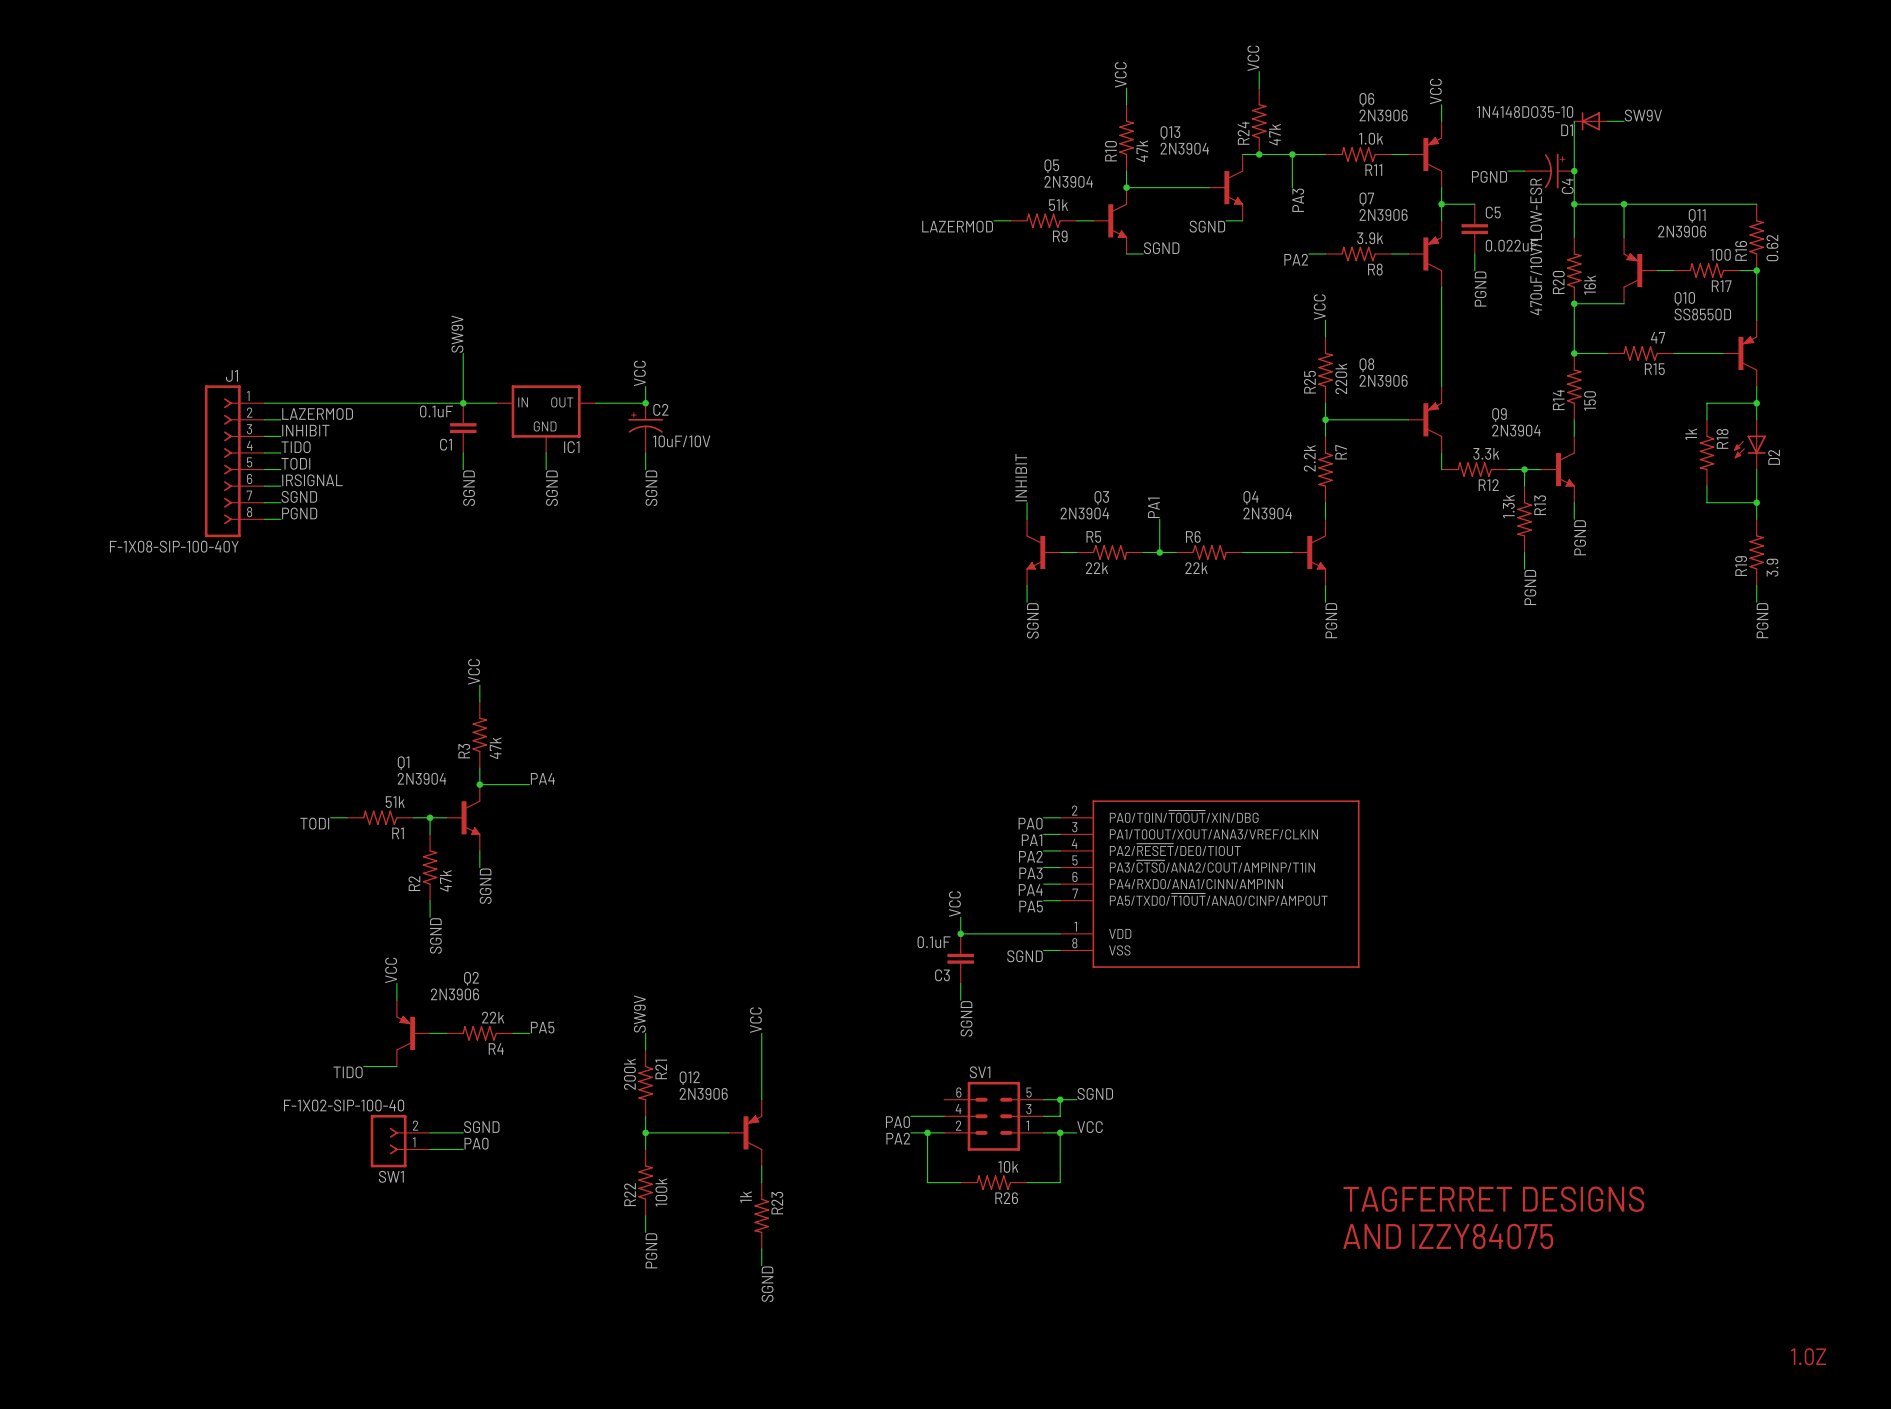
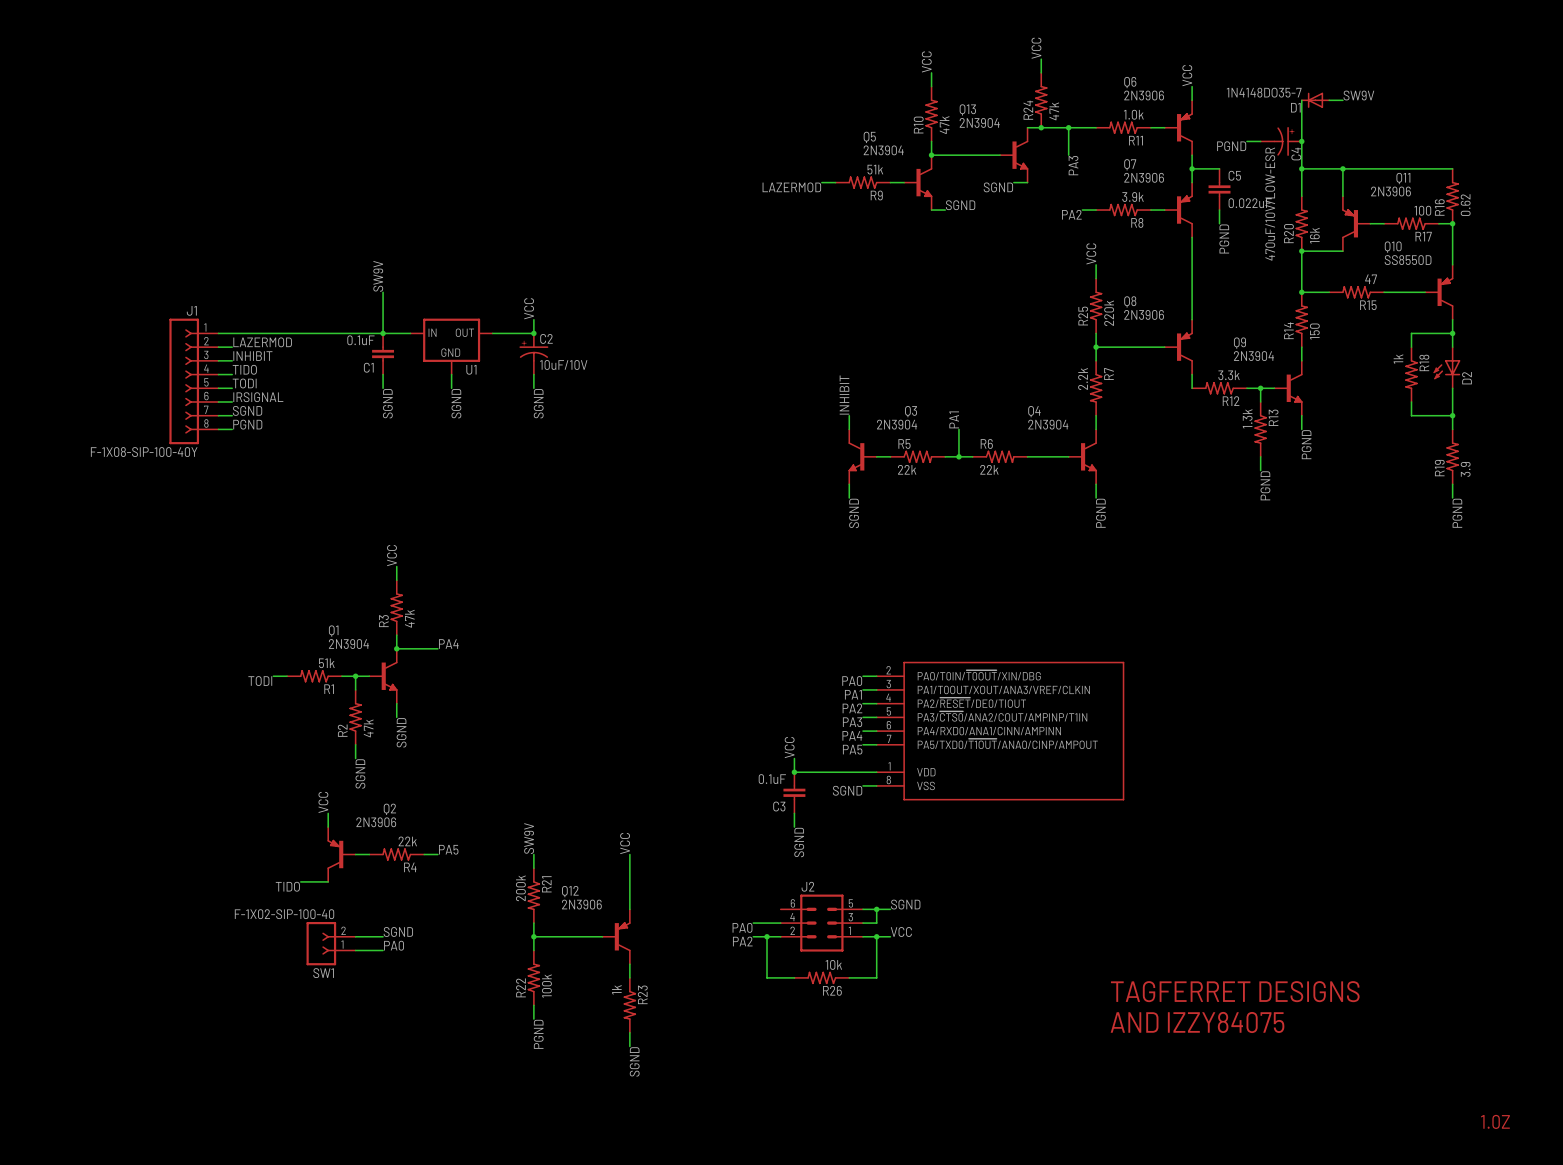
D1 value: 1N4148DO35-10 (1525, 112) -> 1N4148DO35-7 (1264, 92)
IC1 name: IC1 (571, 447) -> U1 (471, 369)
SV1 name: SV1 (980, 1072) -> J2 (807, 886)

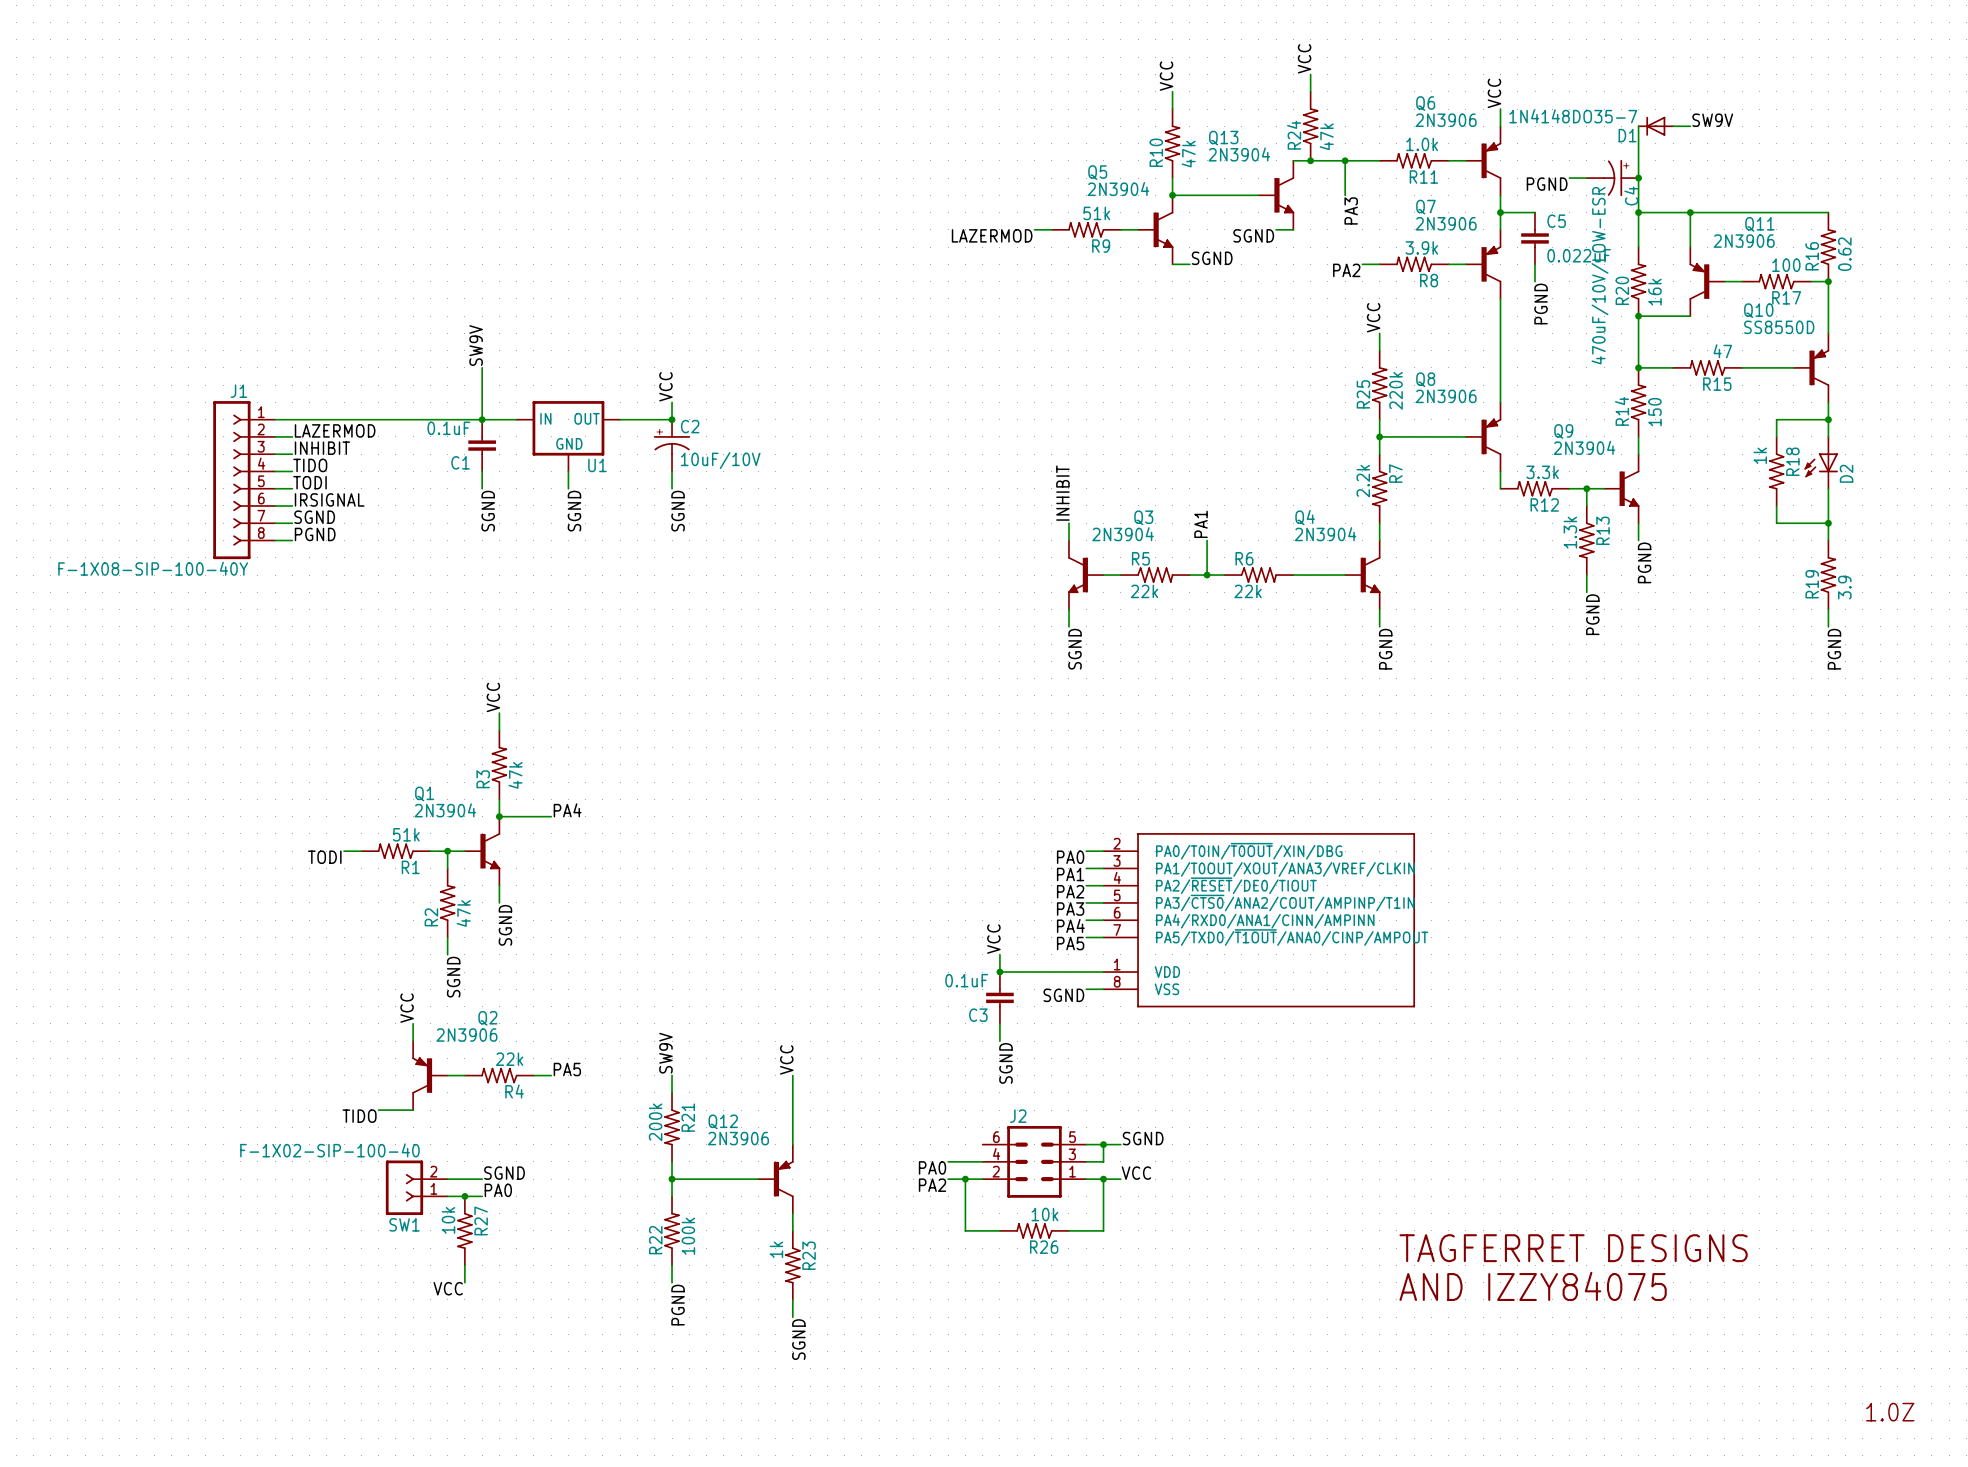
junction: none -> (464, 1196)
R27: none -> 10k (464, 1230)
wire: none -> (464, 1265) (464, 1282)
label: none -> VCC (448, 1288)

